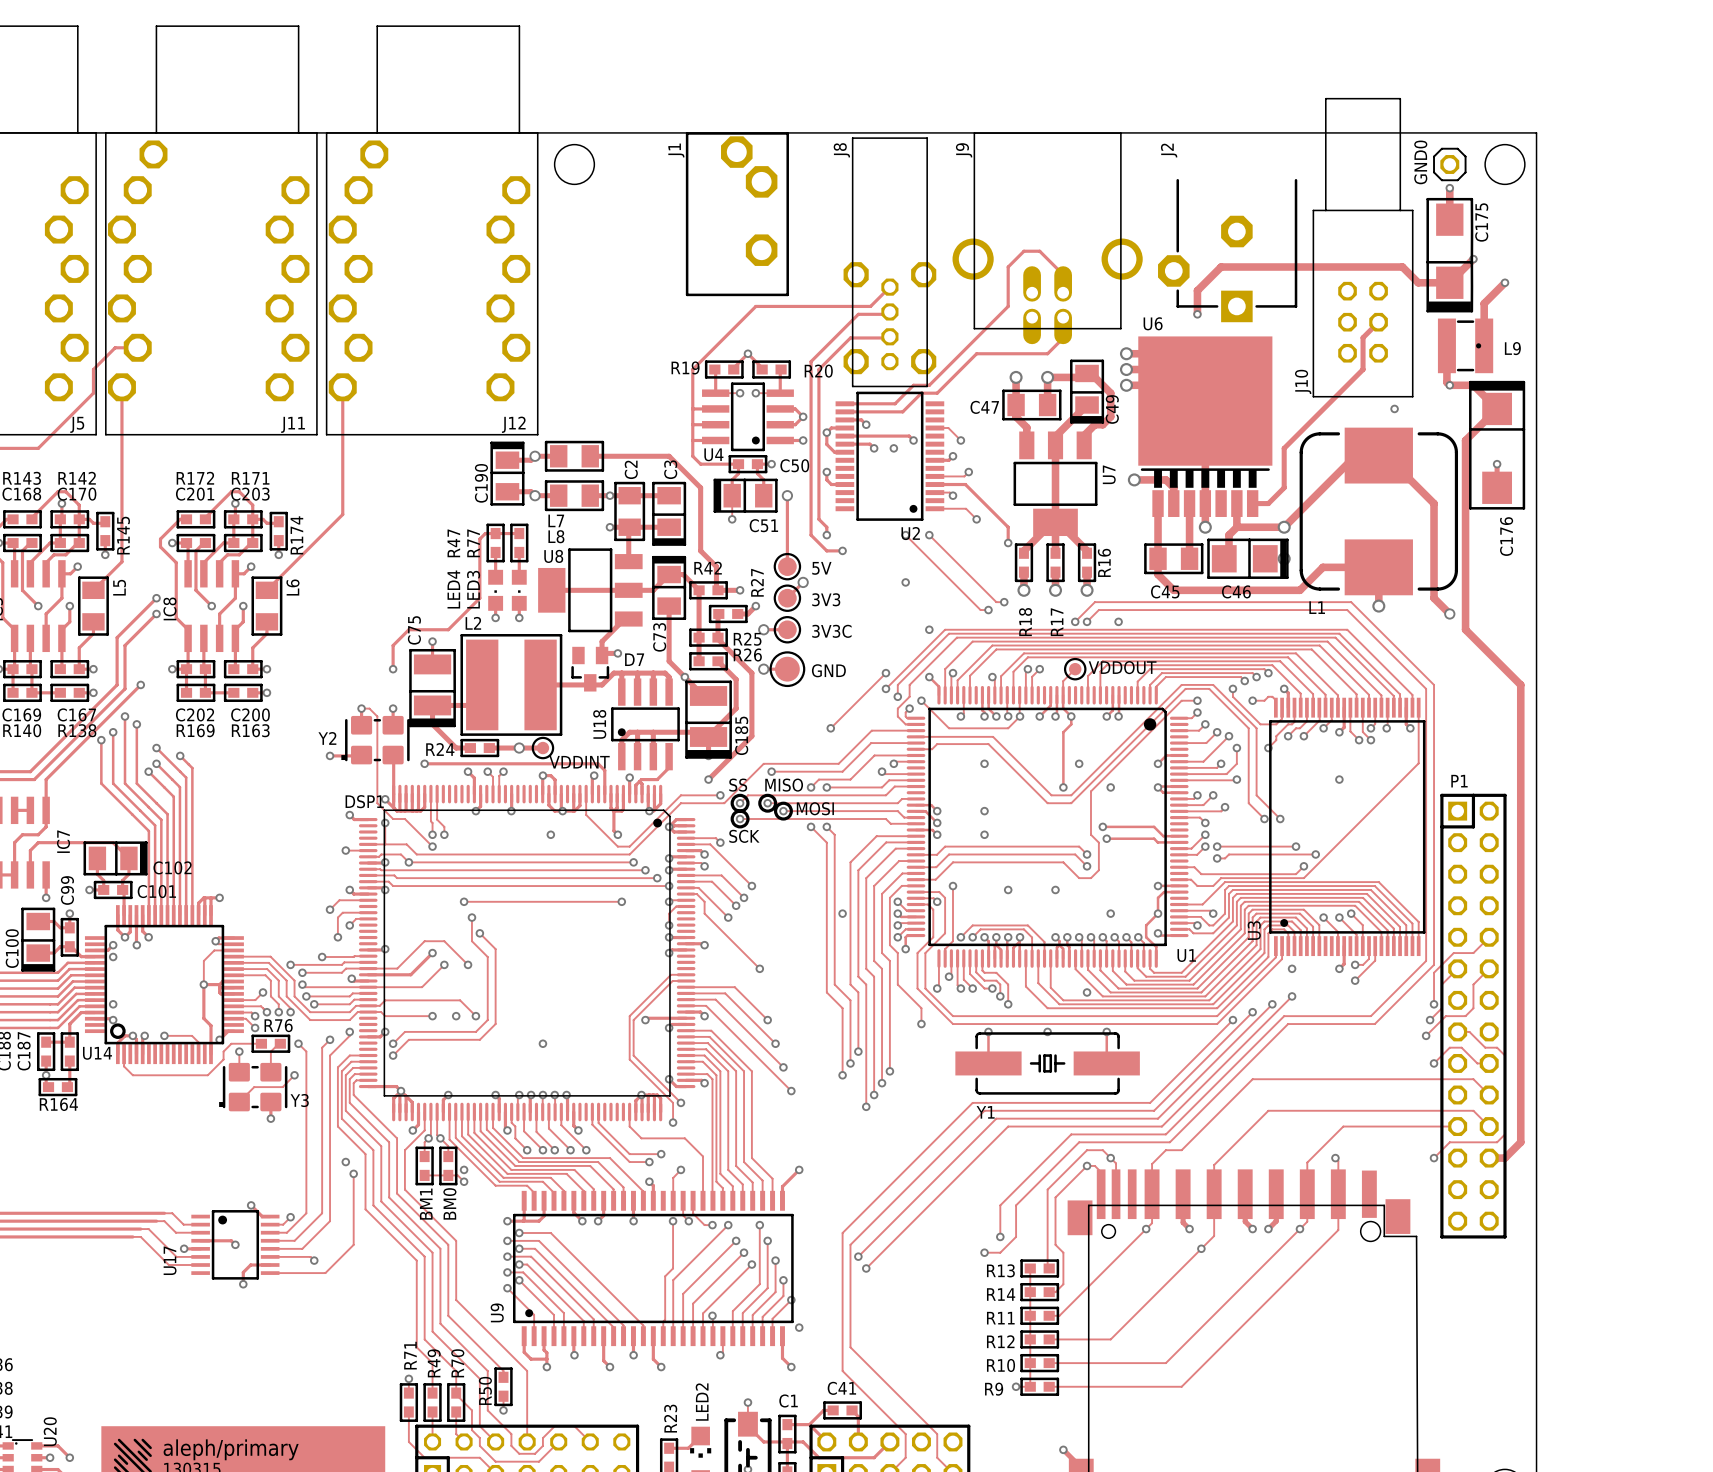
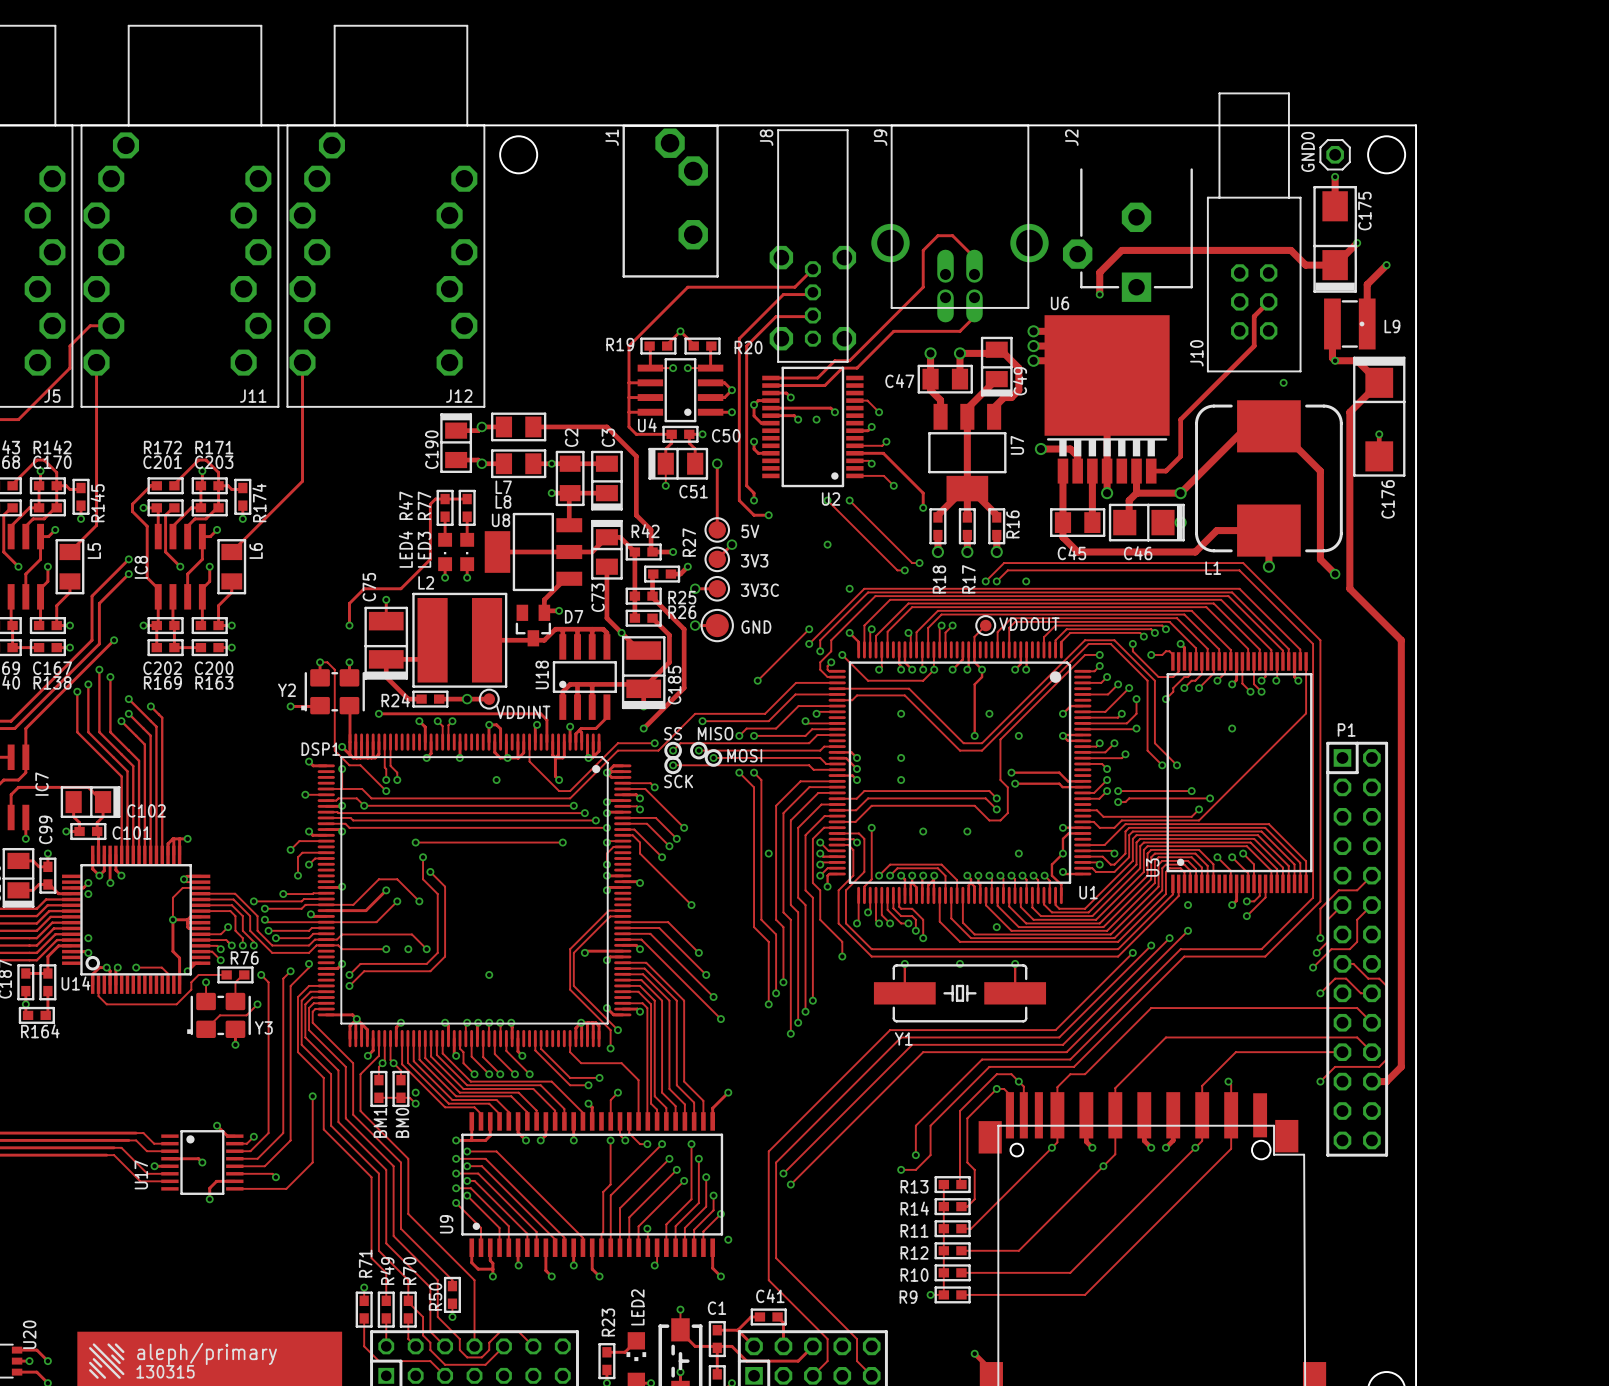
via: (345, 1162) -> none

